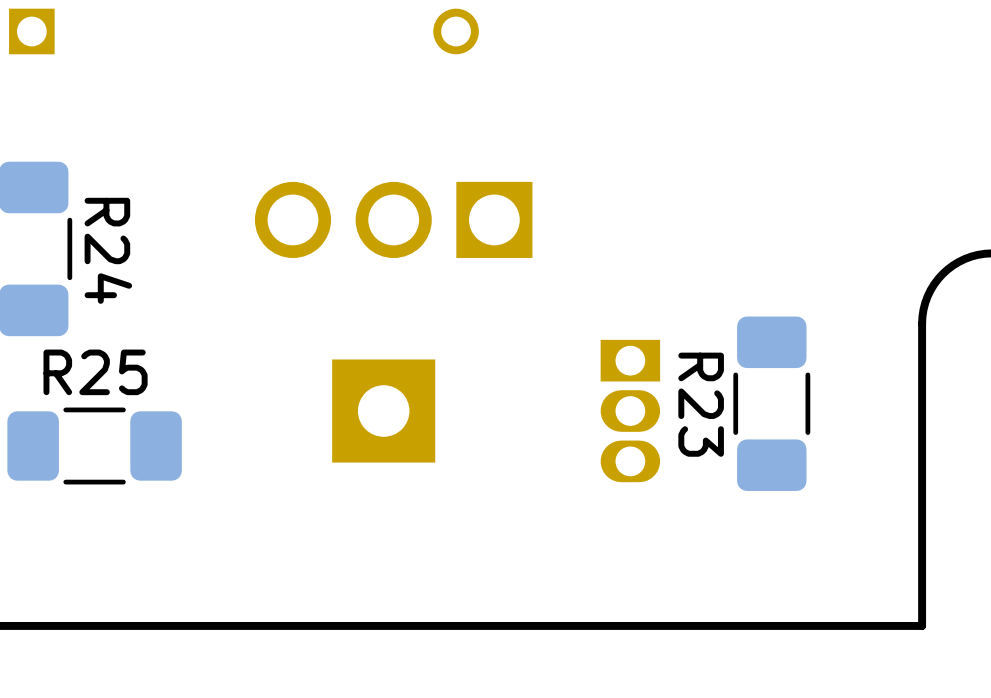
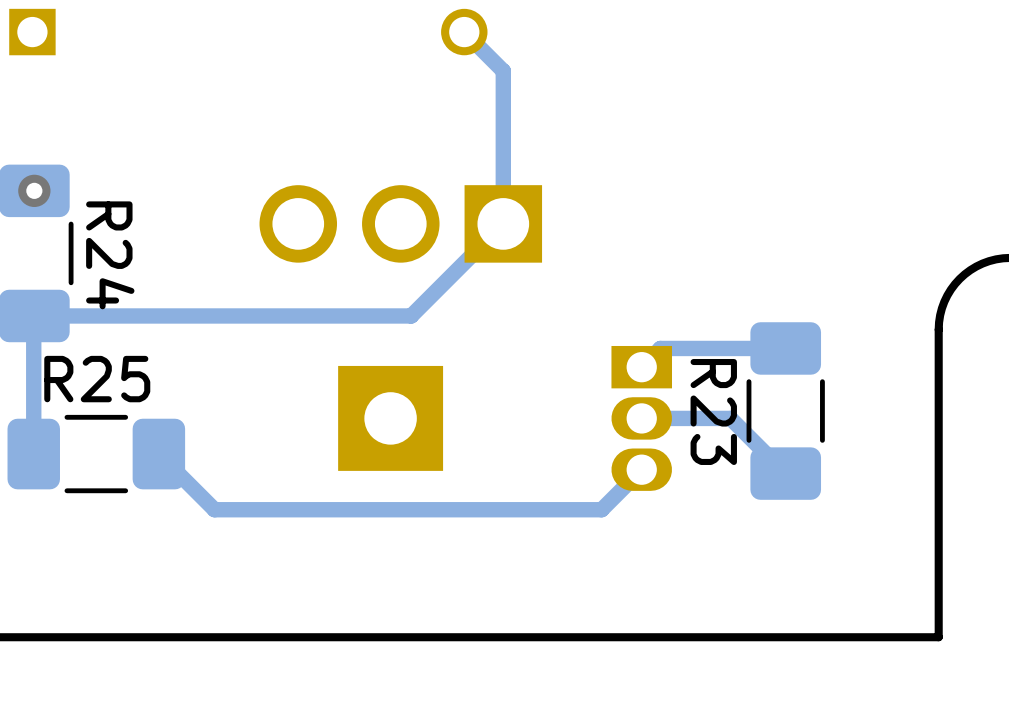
track: none -> (464, 32) (503, 71) (503, 223) (411, 315) (34, 315) (33, 454)
via: none -> (34, 190)
track: none -> (785, 348) (660, 348) (641, 367)
track: none -> (641, 418) (730, 418) (785, 473)
track: none -> (158, 454) (214, 509) (601, 509) (641, 469)

